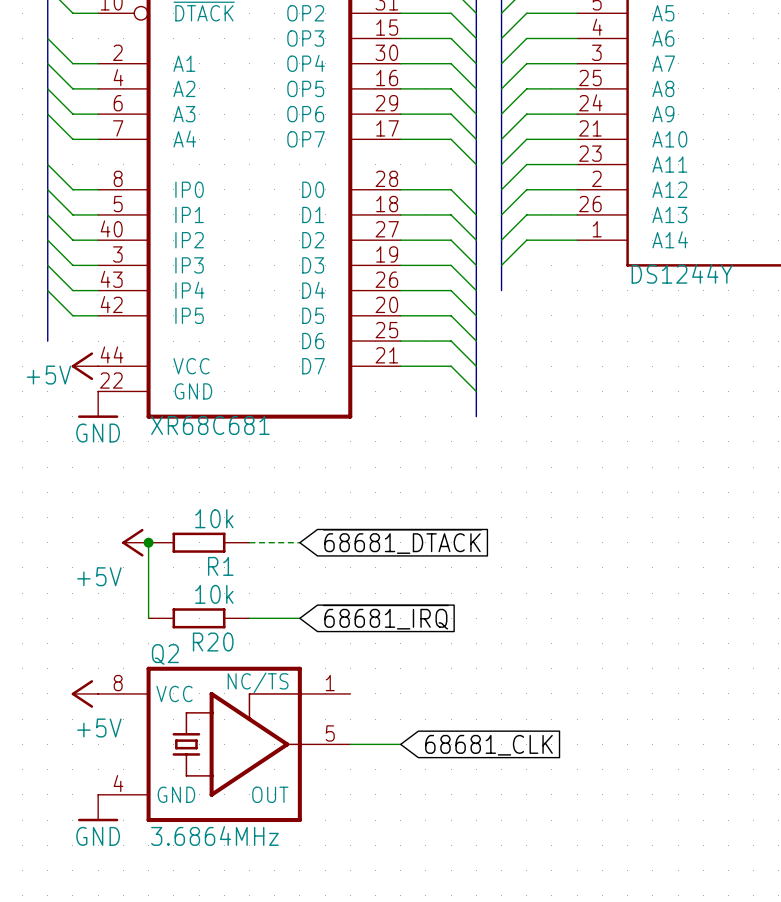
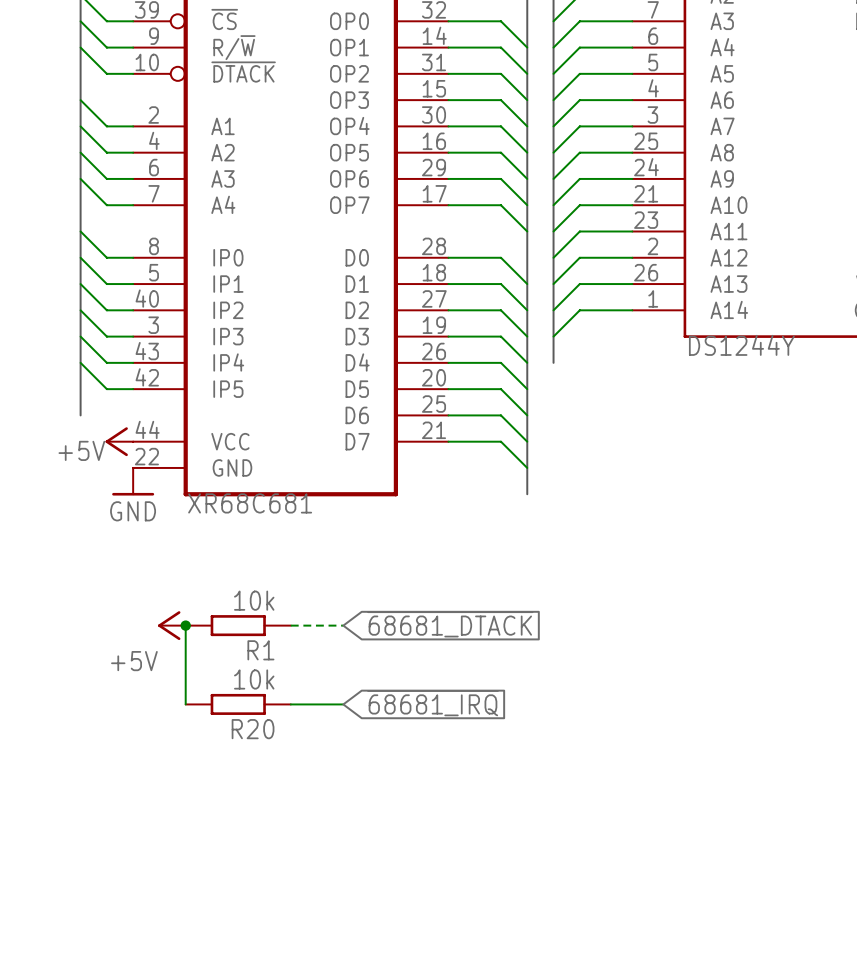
power symbol: +5V (84, 693) -> none
Q2: 3.6864MHz (224, 744) -> none
wire: (350, 744) (400, 744) -> none
global label: 68681_CLK (488, 745) -> none
power symbol: GND (98, 808) -> none

